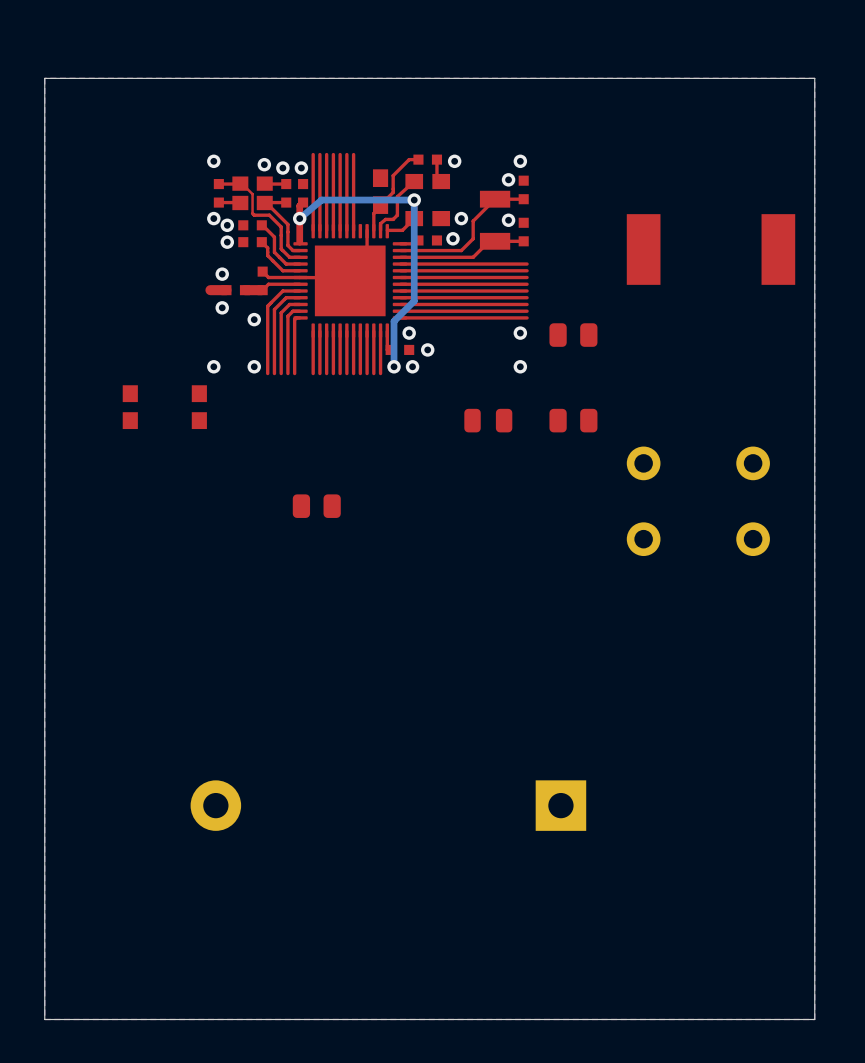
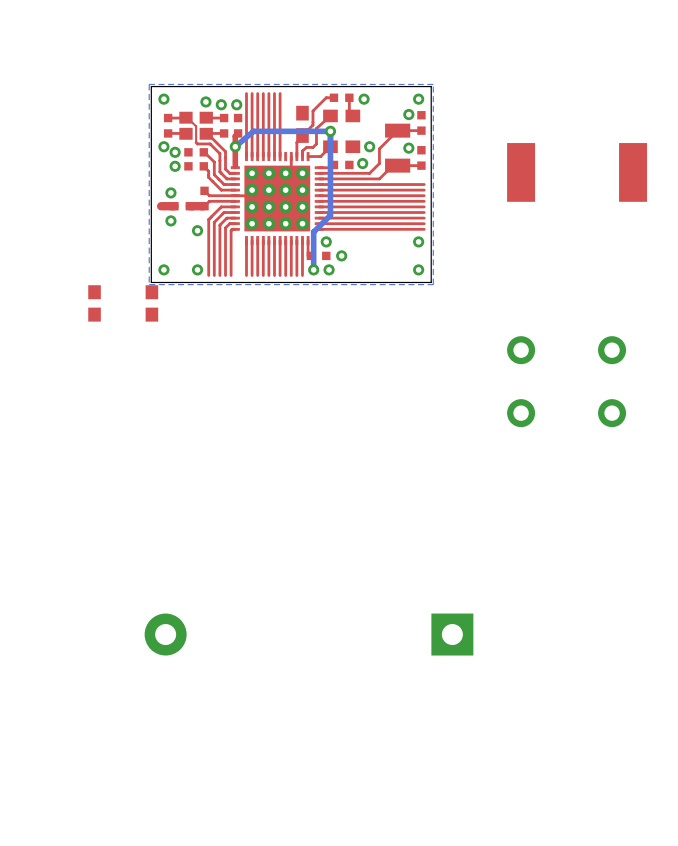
board edge: (814, 78) (814, 1019) (44, 1019) (44, 78) (814, 78) -> none
bottom zone outline: none -> (433, 84) (433, 284) (149, 284) (149, 84) (433, 84)
board edge: none -> (431, 86) (431, 282) (151, 282) (151, 86) (431, 86)
part footprint: [293, 224, 408, 338] -> [230, 151, 324, 246]
part: (573, 335) -> none
part: (488, 420) -> none
part: (573, 420) -> none
part: (316, 506) -> none

